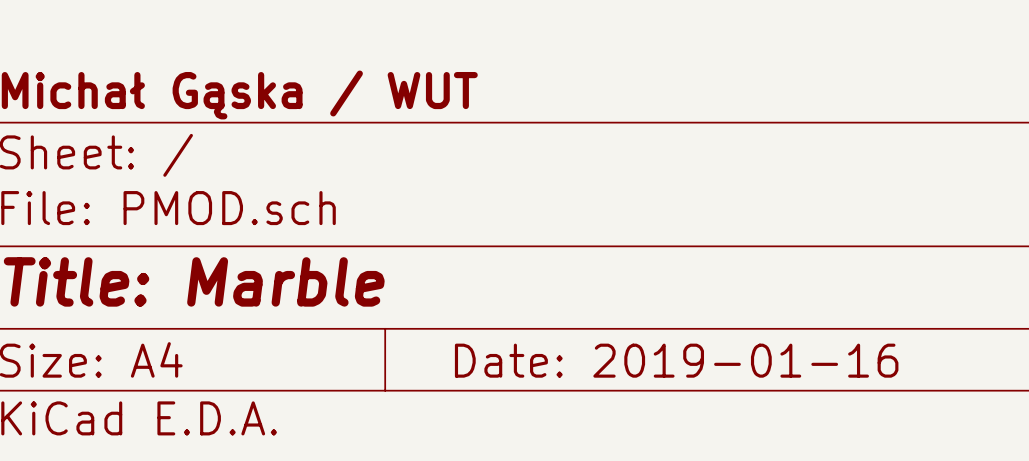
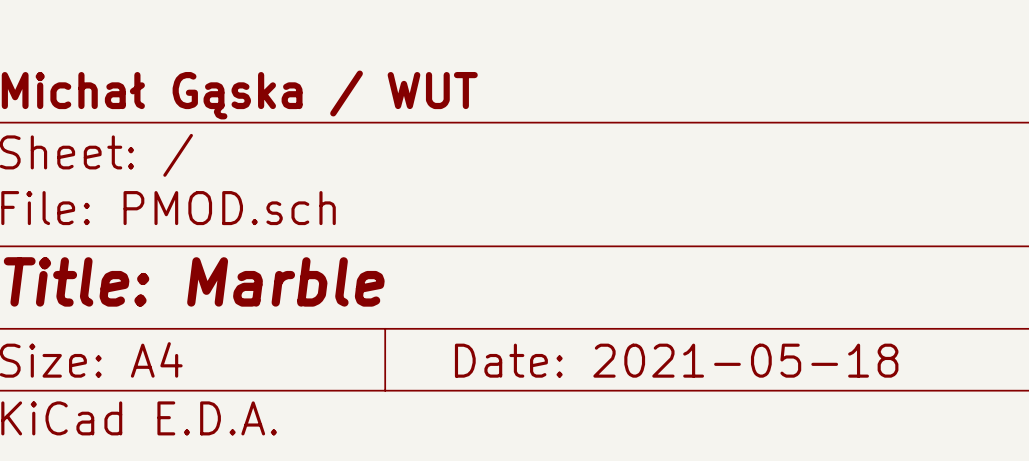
title block: Date: 2019-01-16 (676, 360) -> Date: 2021-05-18 (676, 360)

